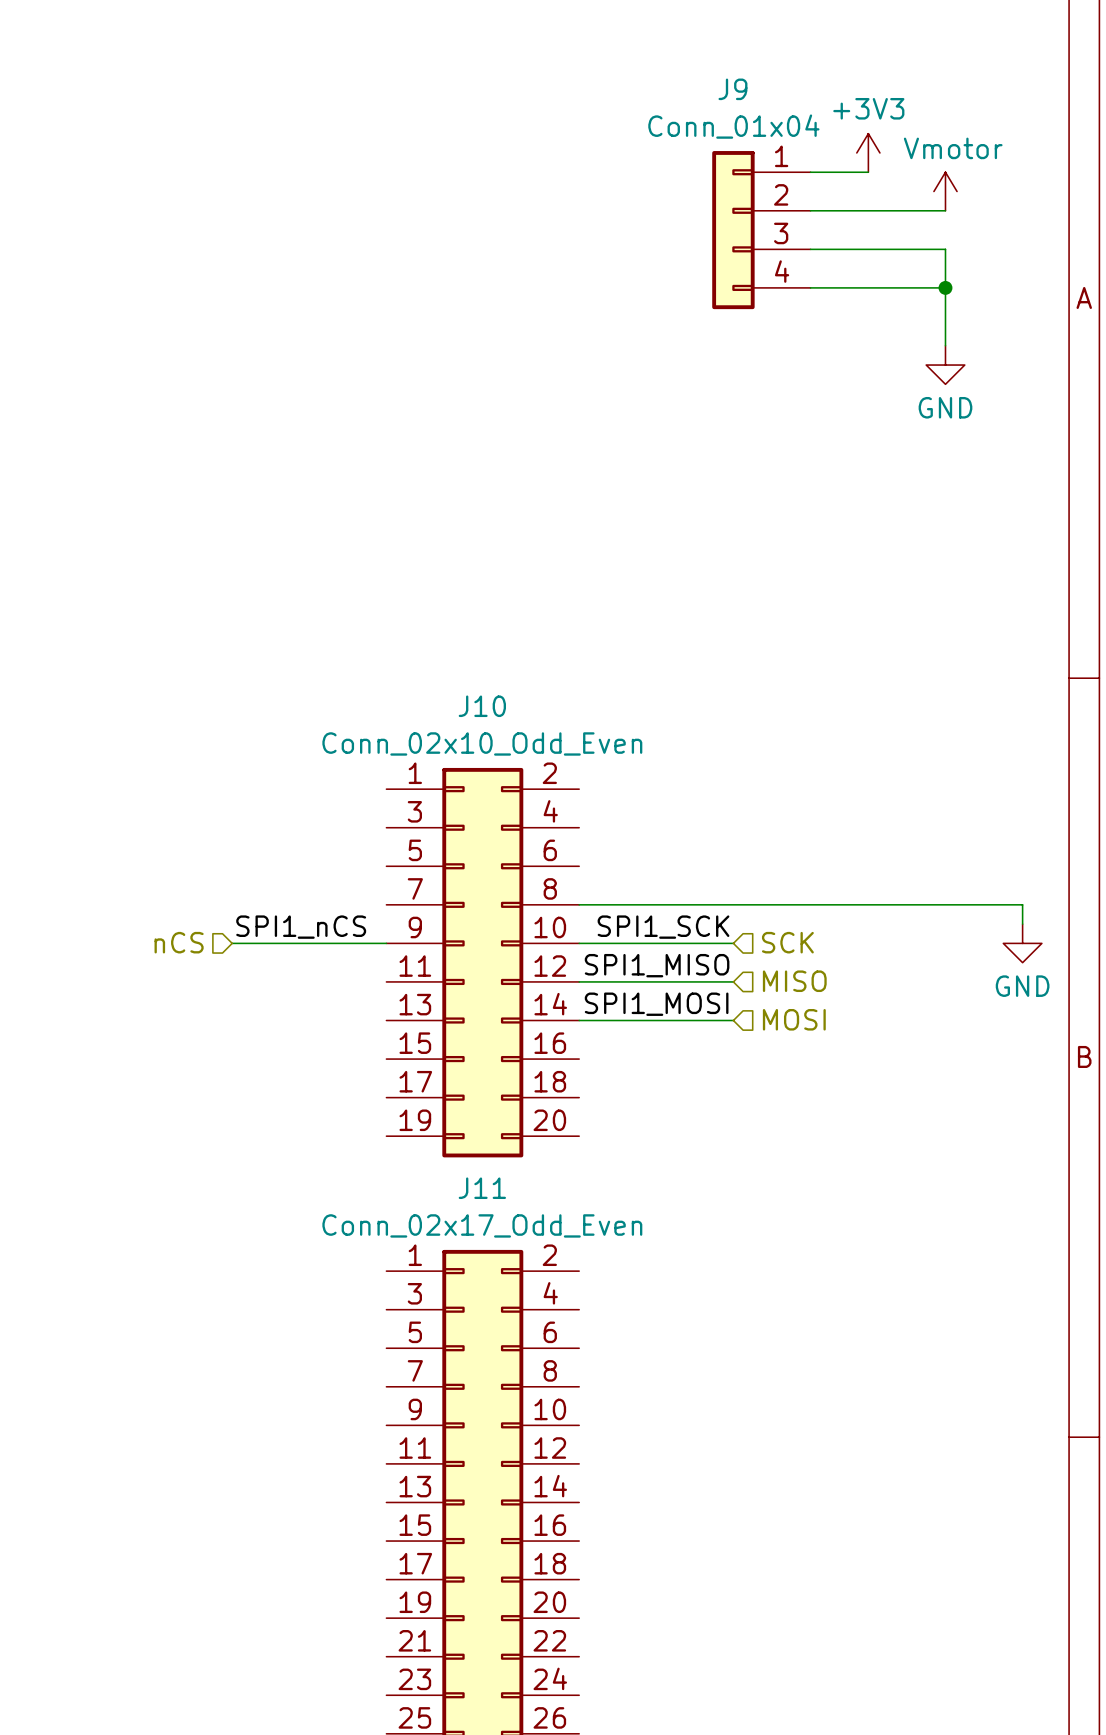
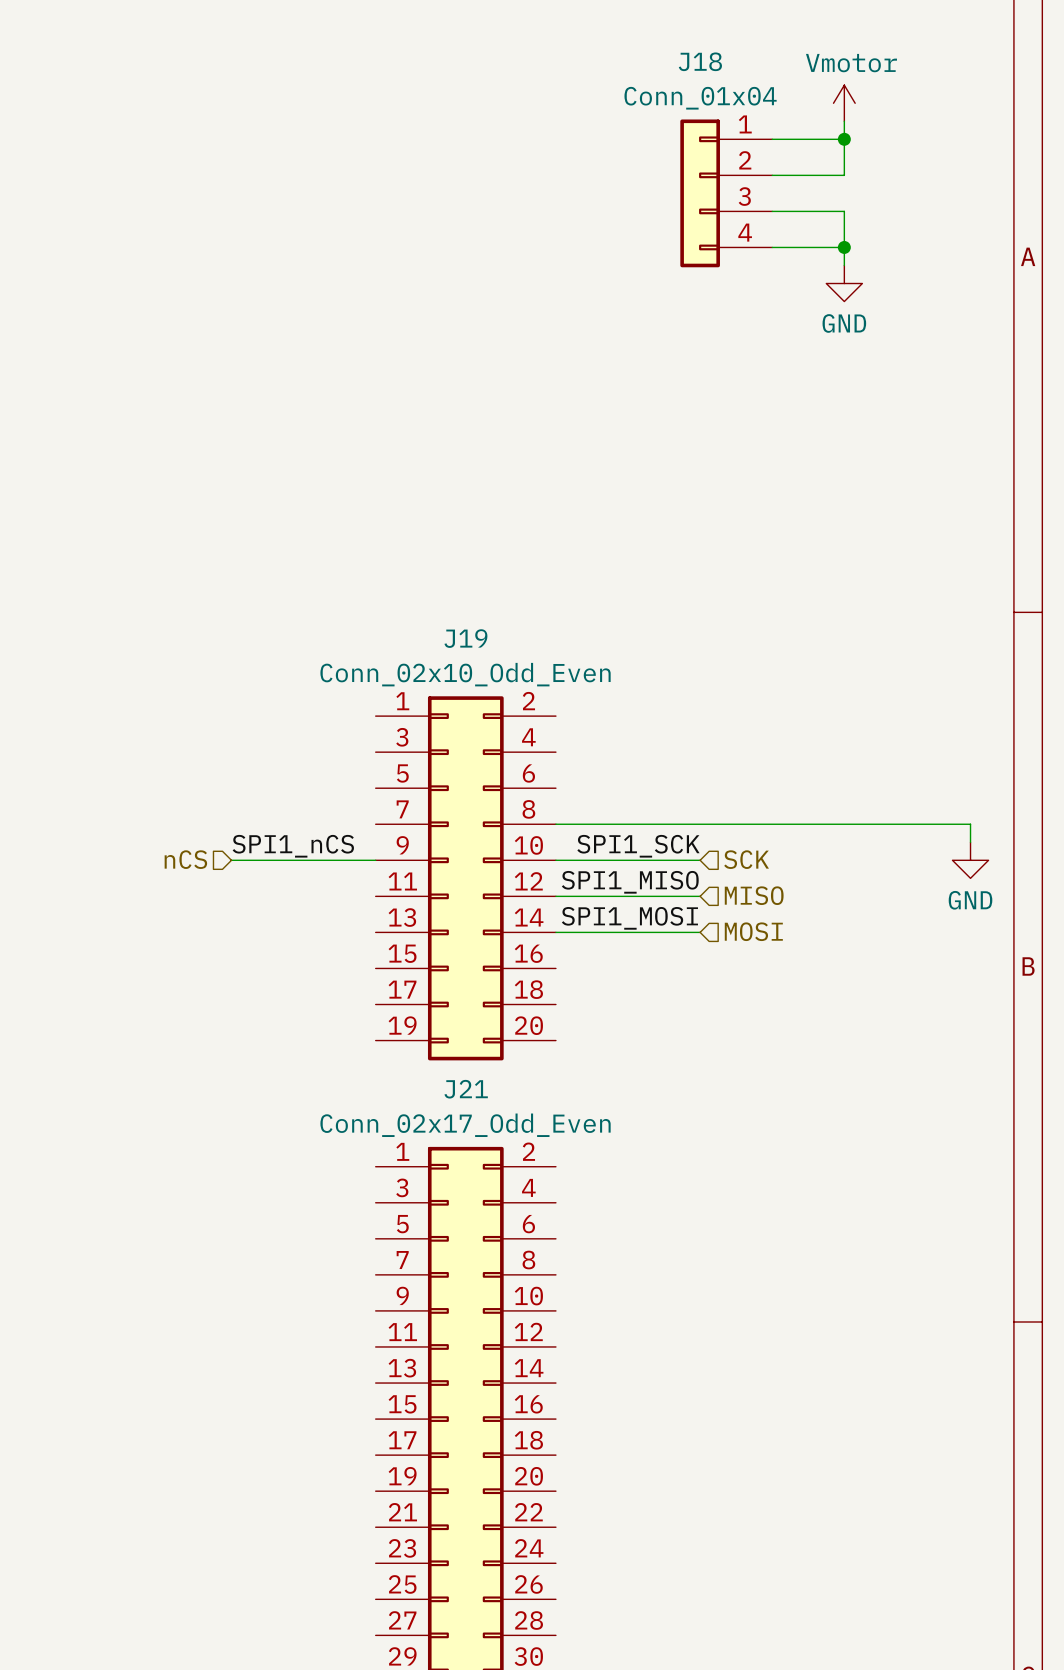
J9 name: J9 (732, 89) -> J18 (700, 61)
power symbol: +3V3 (868, 152) -> none
wire: none -> (826, 139) (844, 139)
junction: none -> (844, 139)
power symbol position: Vmotor (945, 191) -> Vmotor (844, 103)
wire: (887, 210) (945, 210) -> (844, 175) (844, 121)
wire: (887, 249) (945, 249) (945, 345) -> (844, 211) (844, 265)
wire: (887, 287) (945, 287) -> none
junction position: (945, 287) -> (844, 247)
power symbol position: GND (945, 365) -> GND (844, 283)
J10 name: J10 (482, 706) -> J19 (465, 638)
J11 name: J11 (482, 1188) -> J21 (466, 1089)

